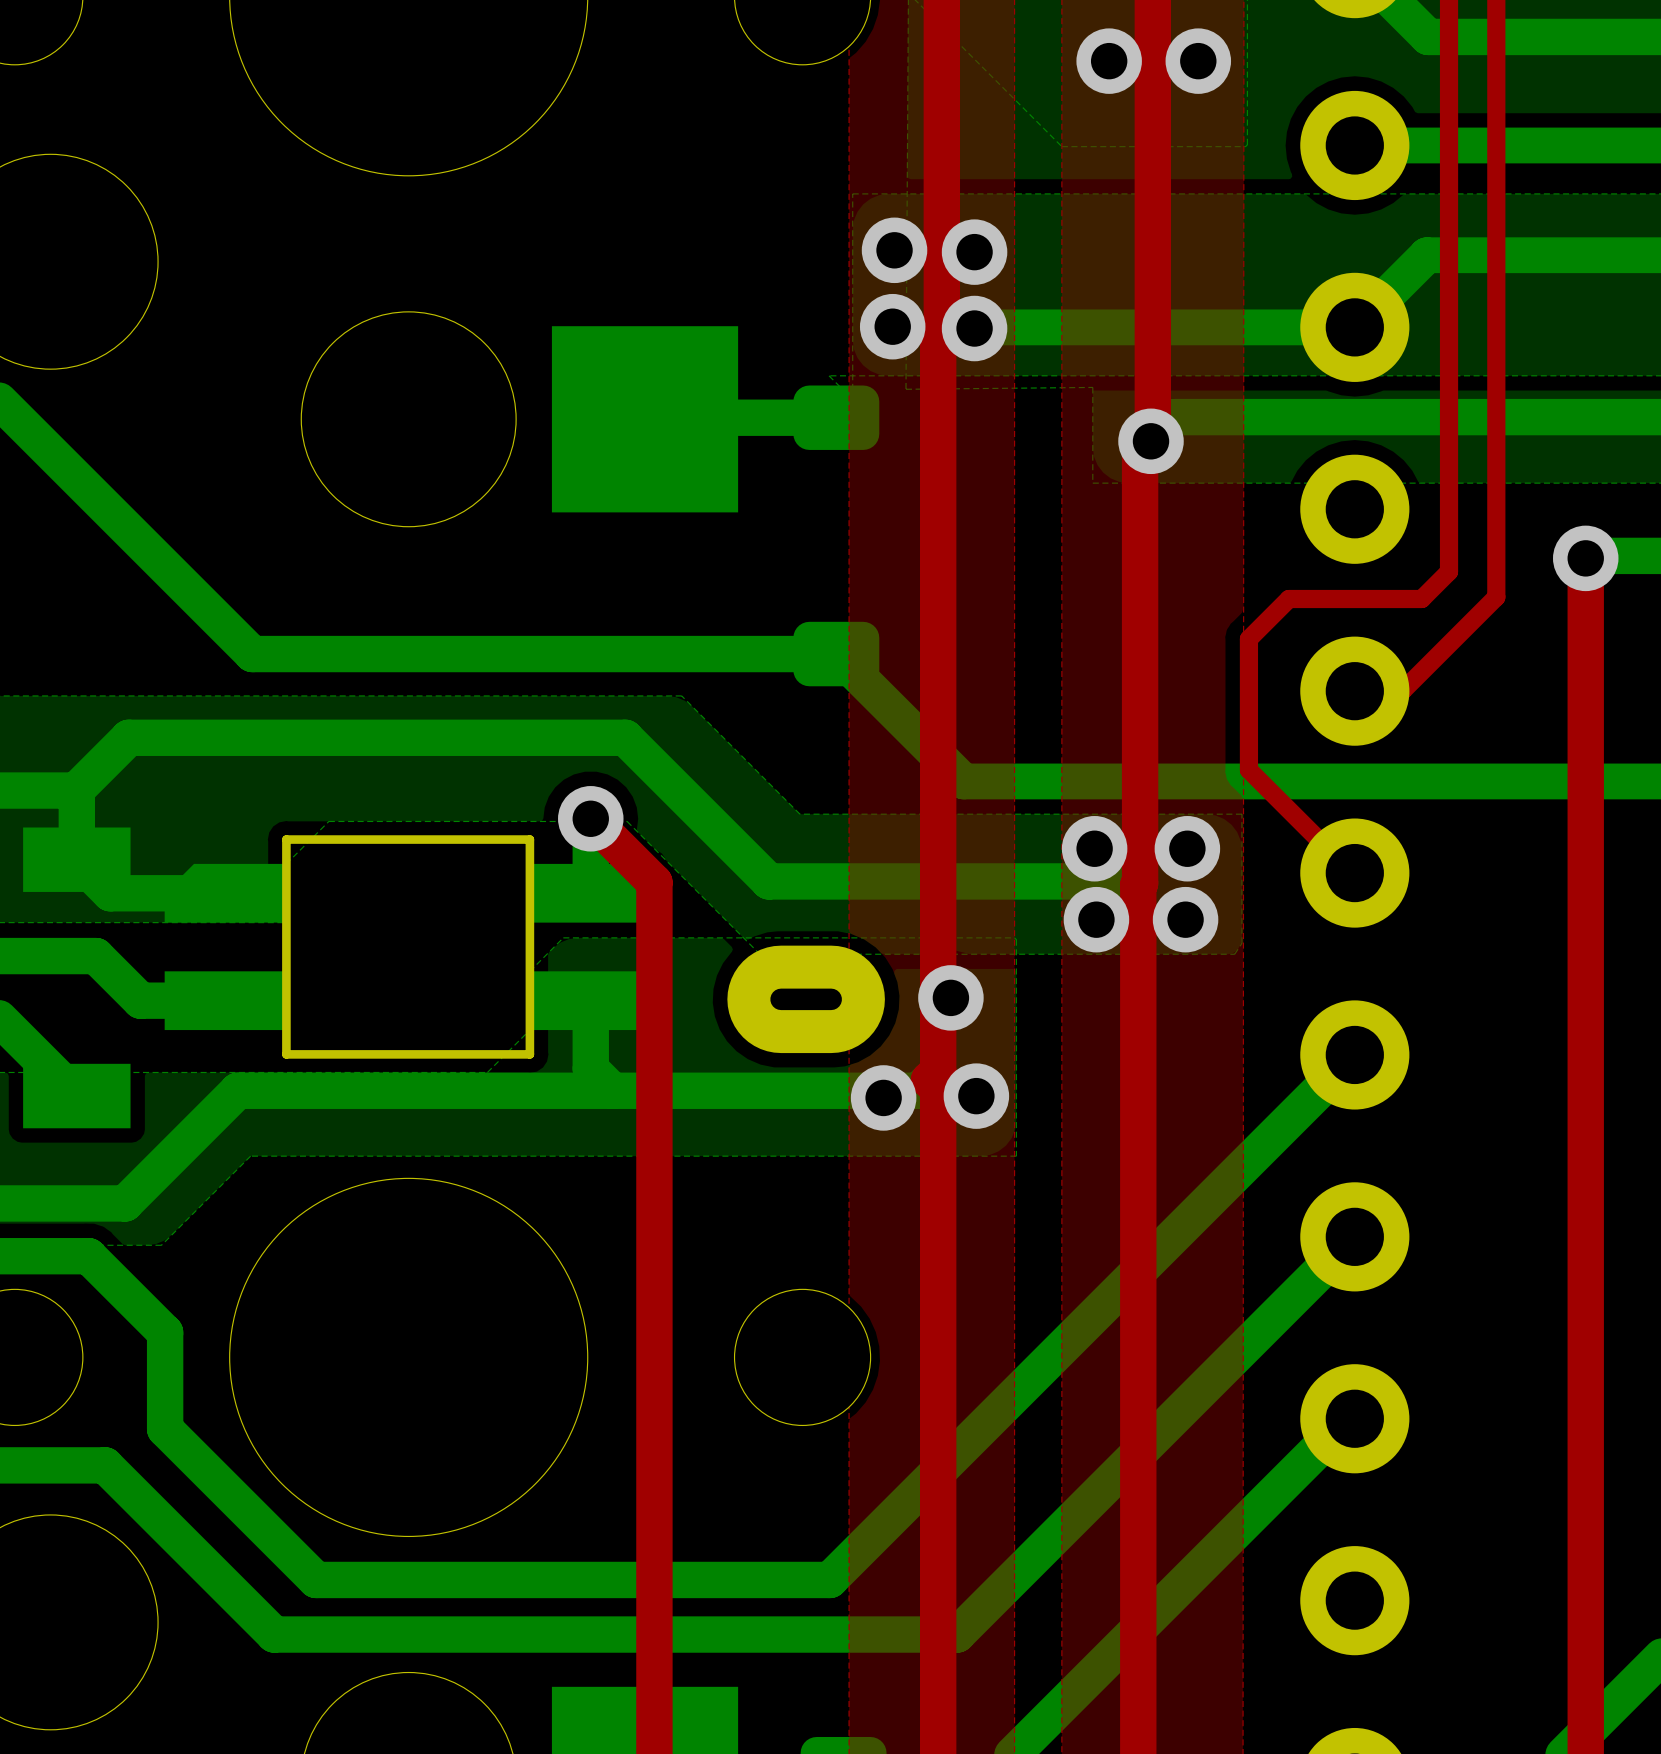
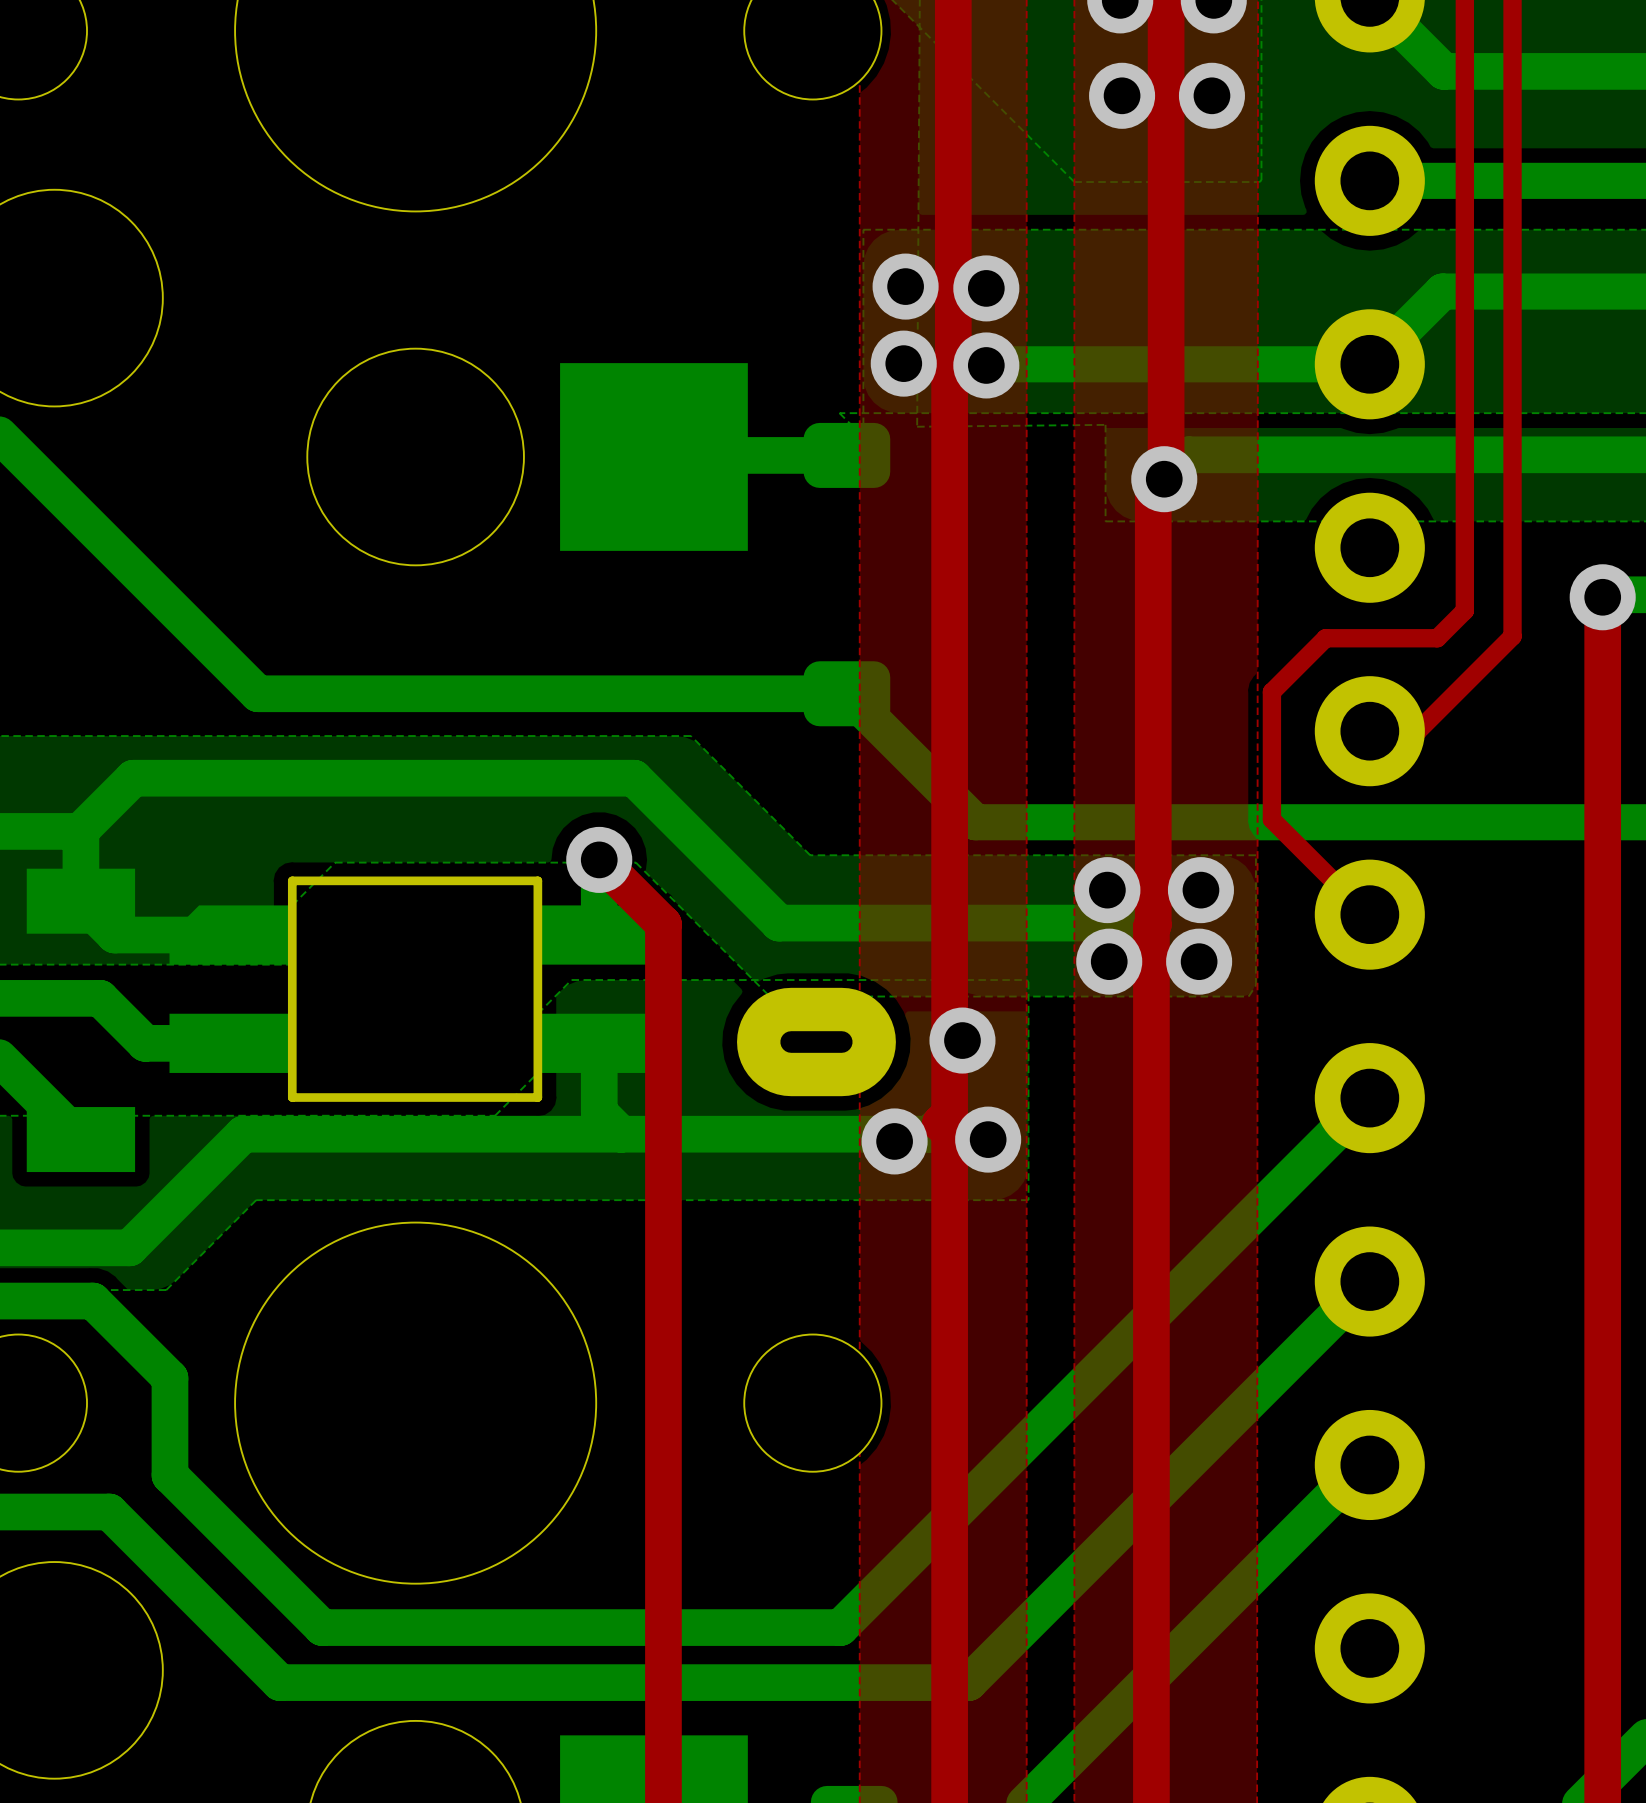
top track: (1311, 599) (1288, 599) (1248, 639) (1248, 769) (1257, 778) -> (1325, 638) (1271, 692) (1271, 819)

